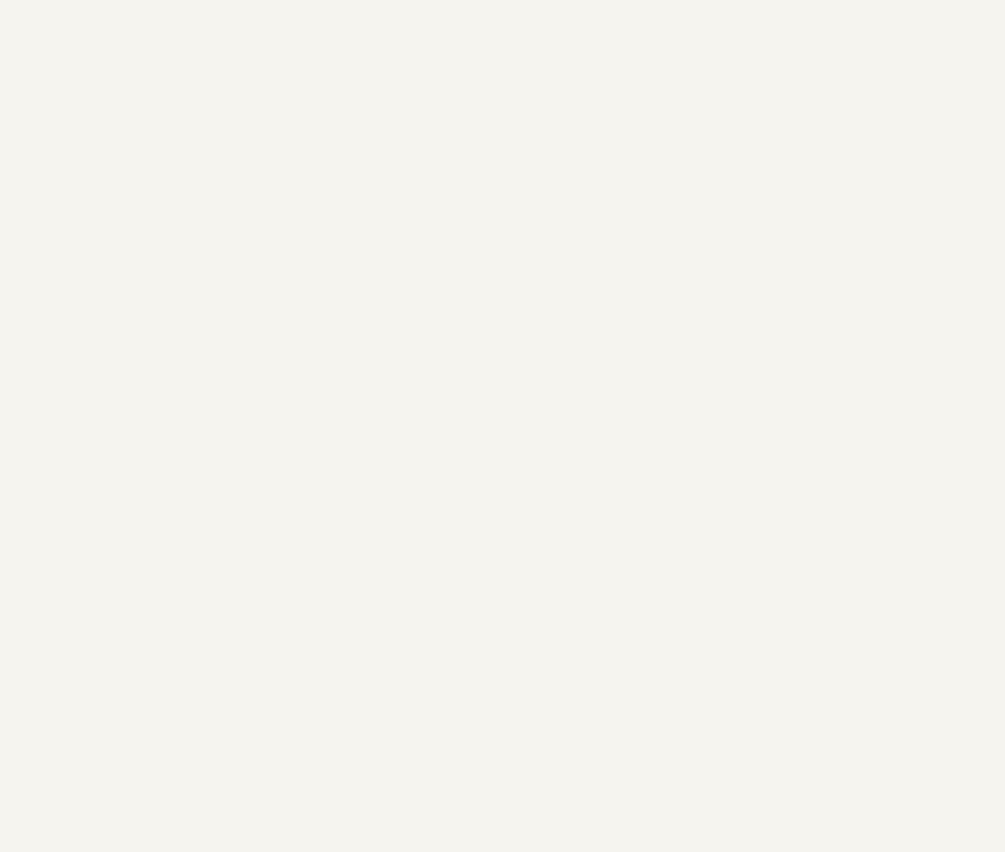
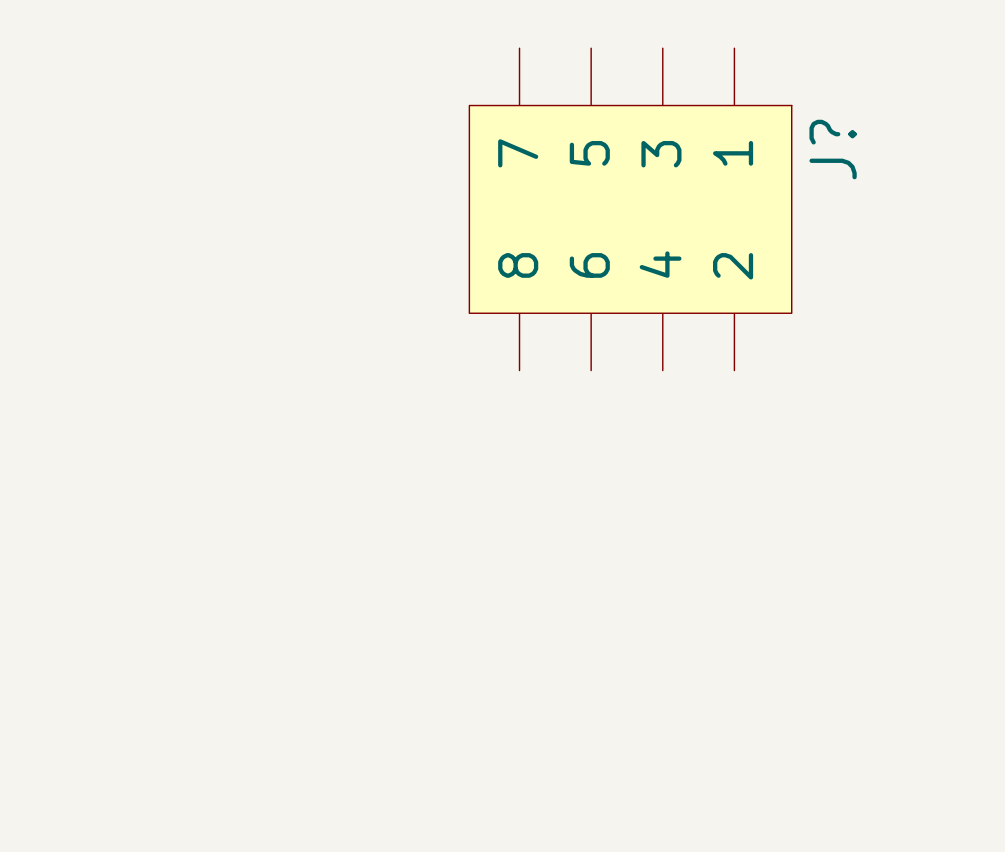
J?: none -> (630, 209)

